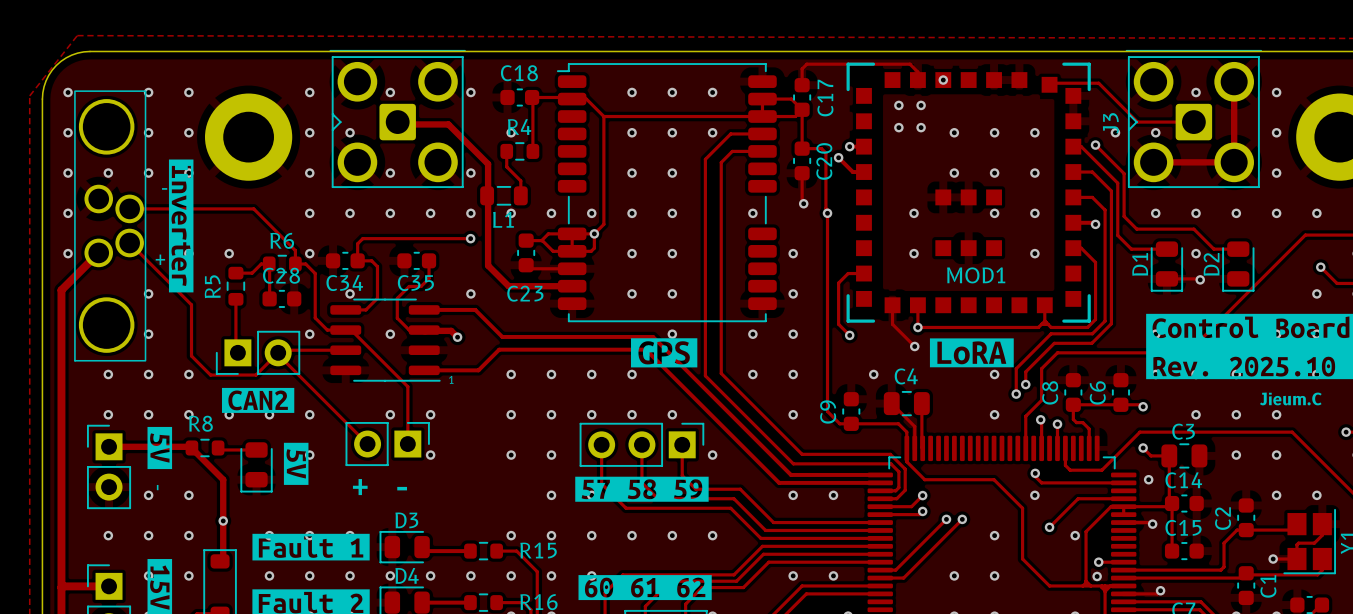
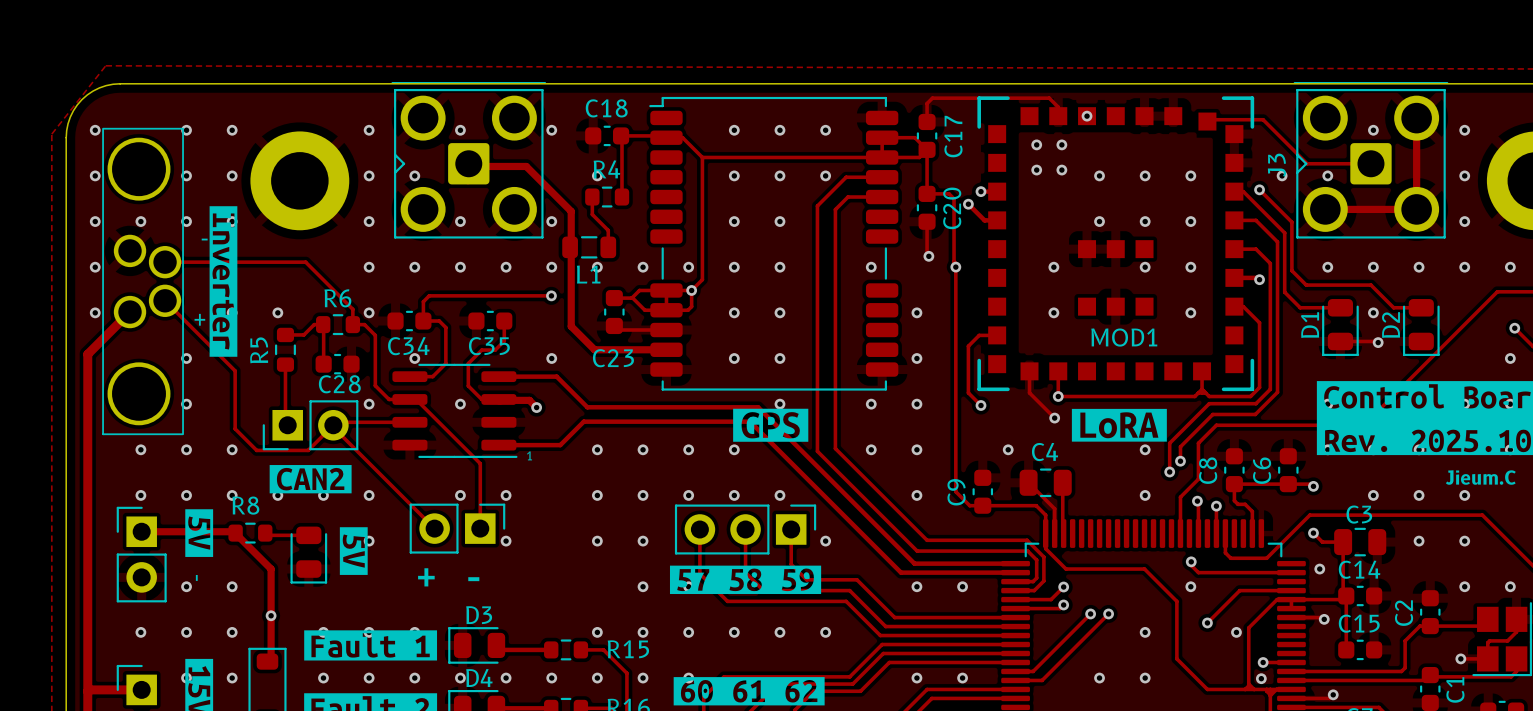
C28 name position: C28 (281, 275) -> C28 (339, 384)

